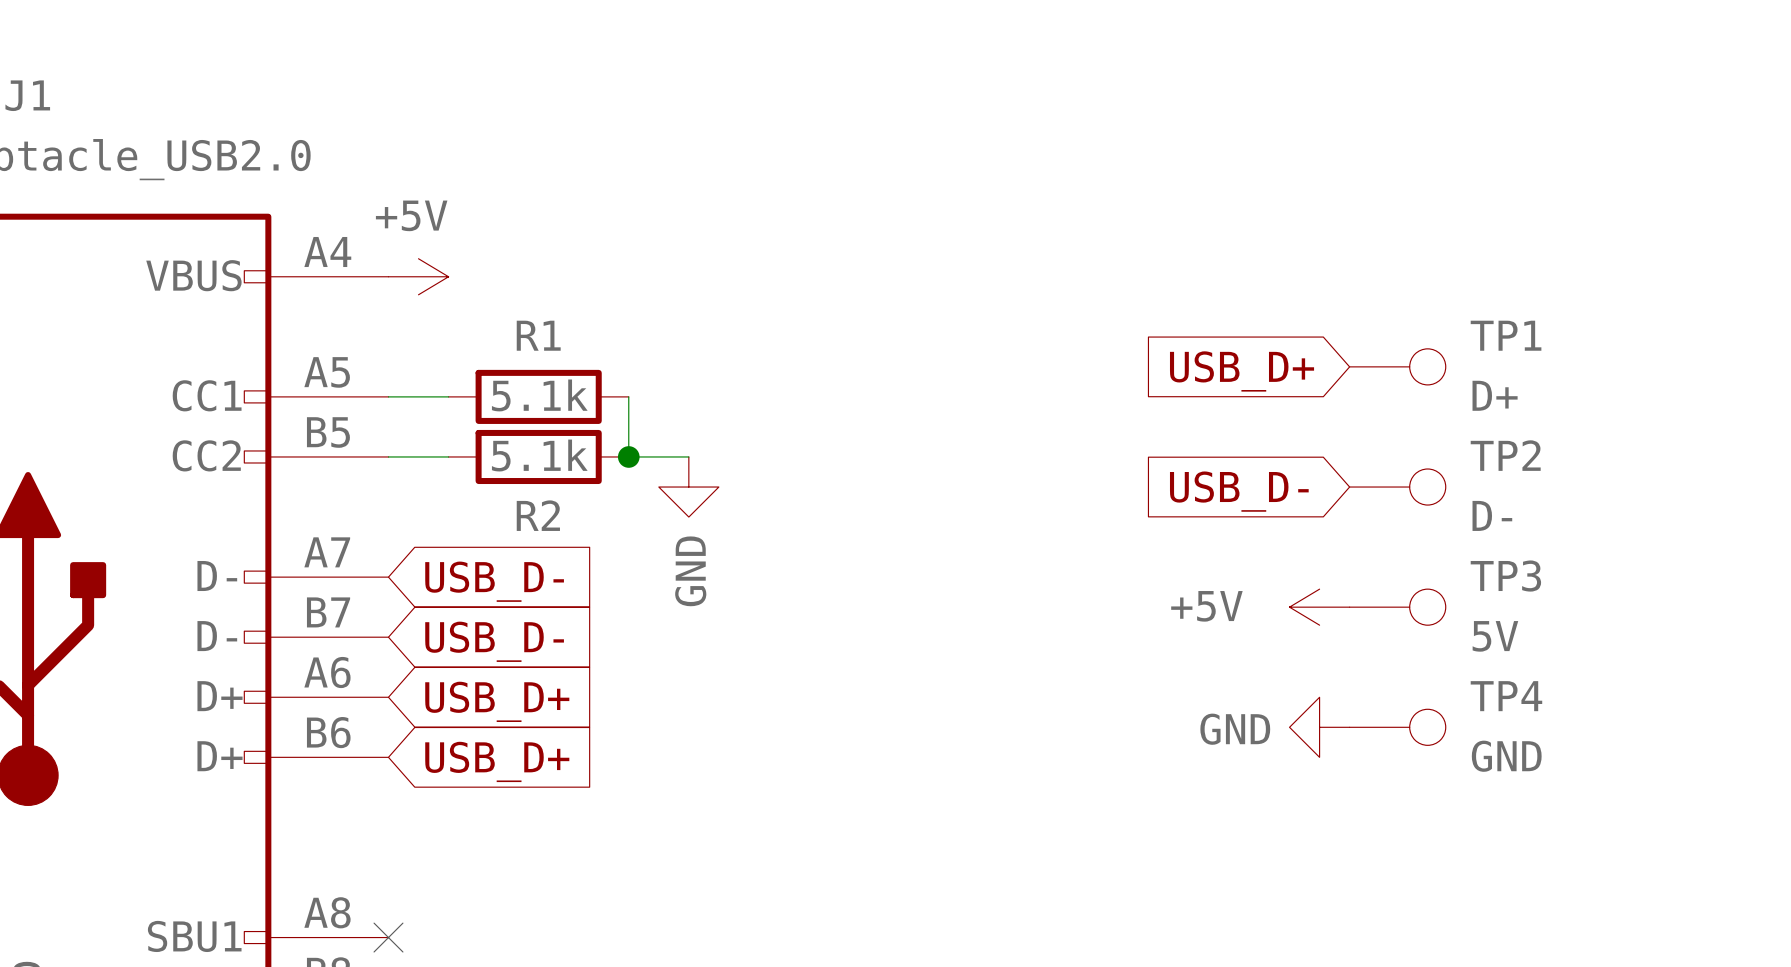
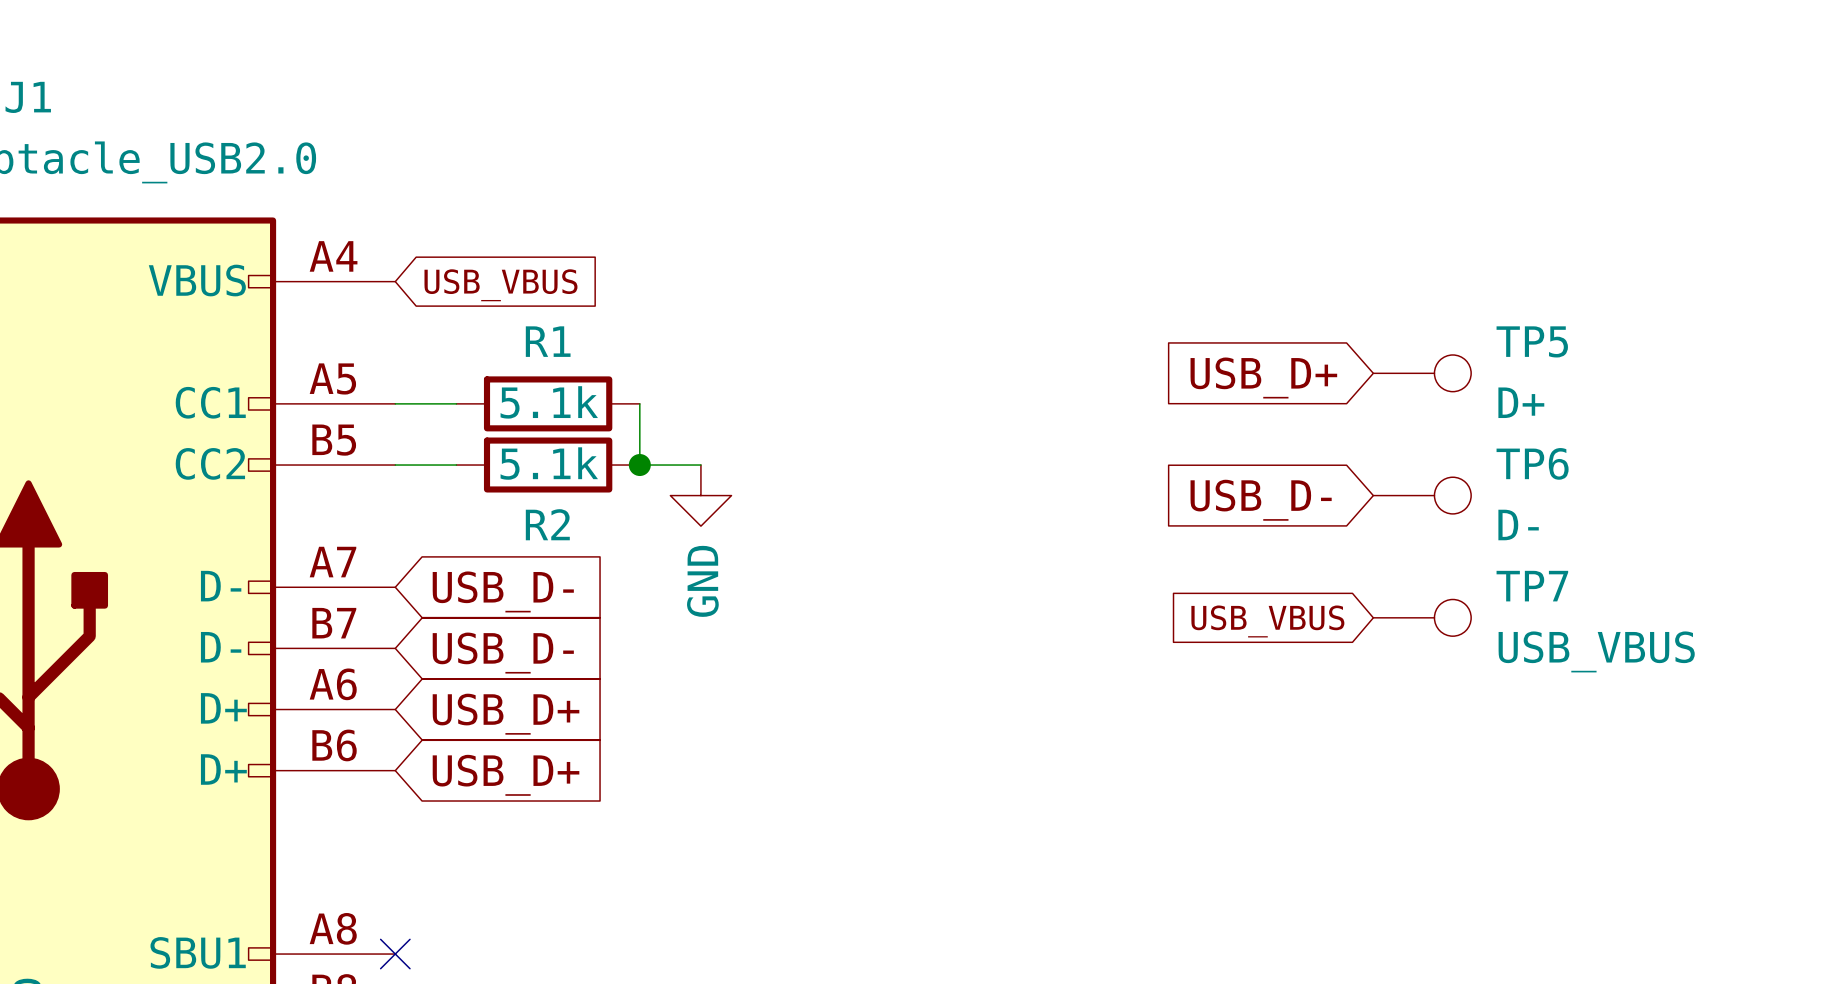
power symbol: +5V (418, 276) -> none
global label: none -> USB_VBUS (500, 285)
TP1 name: TP1 (1506, 335) -> TP5 (1532, 341)
TP2 name: TP2 (1505, 455) -> TP6 (1532, 463)
TP3 name: TP3 (1505, 576) -> TP7 (1532, 586)
power symbol: +5V (1319, 607) -> none
global label: none -> USB_VBUS (1267, 621)
TP3 value: 5V (1495, 636) -> USB_VBUS (1596, 651)
power symbol: GND (1319, 727) -> none
TP4: GND (1397, 727) -> none

